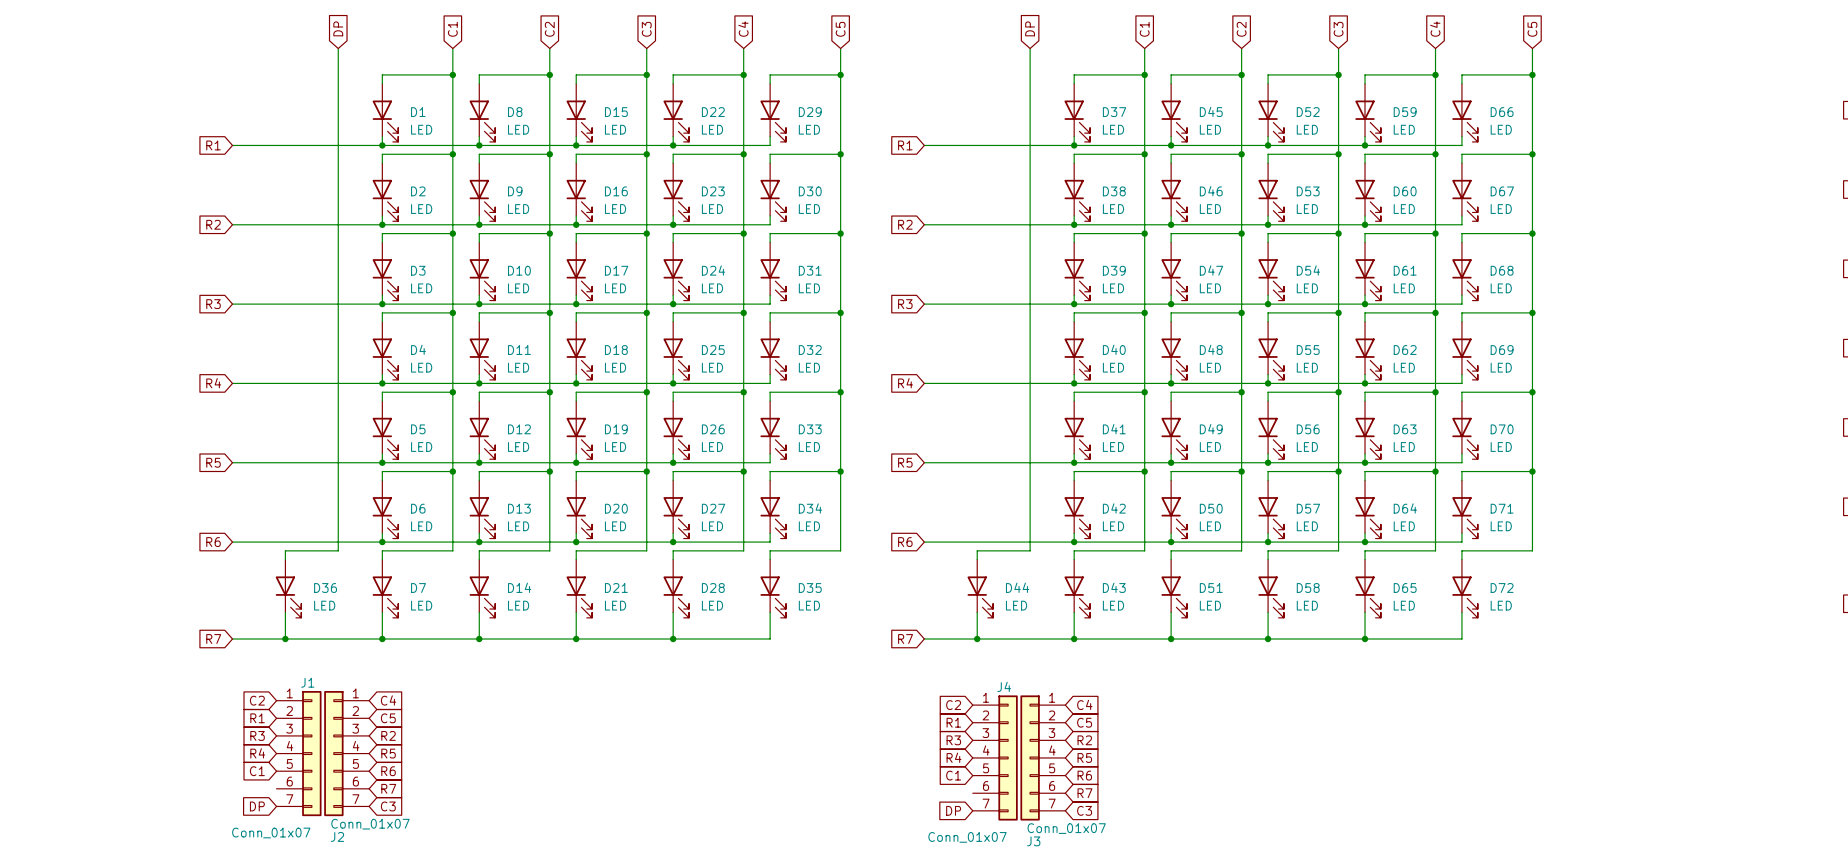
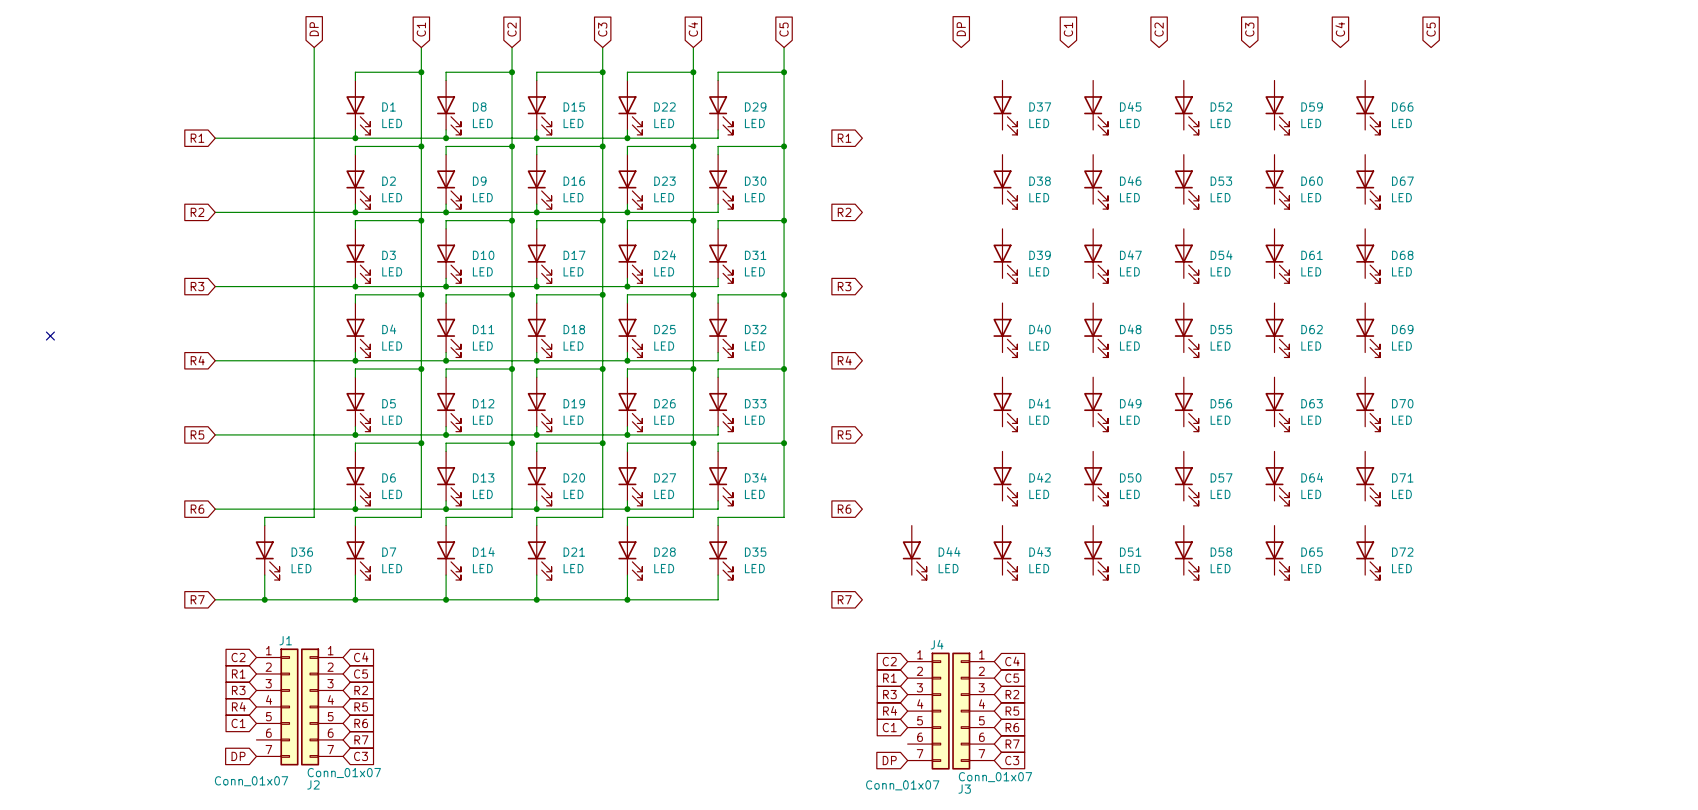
wire: (1030, 48) (1030, 550) (977, 550) (977, 559) -> none
wire: (1144, 48) (1144, 550) (1074, 550) (1074, 559) -> none
wire: (1241, 48) (1241, 550) (1171, 550) (1171, 559) -> none
wire: (1338, 48) (1338, 550) (1268, 550) (1268, 559) -> none
wire: (1435, 48) (1435, 550) (1365, 550) (1365, 559) -> none
wire: (1532, 48) (1532, 550) (1461, 550) (1461, 559) -> none
wire: (1144, 74) (1074, 74) (1074, 83) -> none
junction: (1144, 74) -> none
wire: (1241, 74) (1171, 74) (1171, 83) -> none
junction: (1241, 74) -> none
wire: (1338, 74) (1268, 74) (1268, 83) -> none
junction: (1338, 74) -> none
wire: (1435, 74) (1365, 74) (1365, 83) -> none
junction: (1435, 74) -> none
wire: (1532, 74) (1461, 74) (1461, 83) -> none
junction: (1532, 74) -> none
wire: (1074, 136) (1074, 145) -> none
wire: (1171, 136) (1171, 145) -> none
wire: (1268, 136) (1268, 145) -> none
wire: (1365, 136) (1365, 145) -> none
wire: (1461, 136) (1461, 145) (924, 145) -> none
junction: (1074, 145) -> none
junction: (1171, 145) -> none
junction: (1268, 145) -> none
junction: (1365, 145) -> none
wire: (1144, 154) (1074, 154) (1074, 163) -> none
junction: (1144, 154) -> none
wire: (1241, 154) (1171, 154) (1171, 163) -> none
junction: (1241, 154) -> none
wire: (1338, 154) (1268, 154) (1268, 163) -> none
junction: (1338, 154) -> none
wire: (1435, 154) (1365, 154) (1365, 163) -> none
junction: (1435, 154) -> none
wire: (1532, 154) (1461, 154) (1461, 163) -> none
junction: (1532, 154) -> none
wire: (1074, 215) (1074, 224) -> none
wire: (1171, 215) (1171, 224) -> none
wire: (1268, 215) (1268, 224) -> none
wire: (1365, 215) (1365, 224) -> none
wire: (1461, 215) (1461, 224) (924, 224) -> none
junction: (1074, 224) -> none
junction: (1171, 224) -> none
junction: (1268, 224) -> none
junction: (1365, 224) -> none
wire: (1144, 233) (1074, 233) (1074, 242) -> none
junction: (1144, 233) -> none
wire: (1241, 233) (1171, 233) (1171, 242) -> none
junction: (1241, 233) -> none
wire: (1338, 233) (1268, 233) (1268, 242) -> none
junction: (1338, 233) -> none
wire: (1435, 233) (1365, 233) (1365, 242) -> none
junction: (1435, 233) -> none
wire: (1532, 233) (1461, 233) (1461, 242) -> none
junction: (1532, 233) -> none
wire: (1074, 295) (1074, 304) -> none
wire: (1171, 295) (1171, 304) -> none
wire: (1268, 295) (1268, 304) -> none
wire: (1365, 295) (1365, 304) -> none
wire: (1461, 295) (1461, 304) (924, 304) -> none
junction: (1074, 304) -> none
junction: (1171, 304) -> none
junction: (1268, 304) -> none
junction: (1365, 304) -> none
wire: (1144, 312) (1074, 312) (1074, 321) -> none
junction: (1144, 312) -> none
wire: (1241, 312) (1171, 312) (1171, 321) -> none
junction: (1241, 312) -> none
wire: (1338, 312) (1268, 312) (1268, 321) -> none
junction: (1338, 312) -> none
wire: (1435, 312) (1365, 312) (1365, 321) -> none
junction: (1435, 312) -> none
wire: (1532, 312) (1461, 312) (1461, 321) -> none
junction: (1532, 312) -> none
no-connect mark: none -> (50, 336)
wire: (1074, 374) (1074, 383) -> none
wire: (1171, 374) (1171, 383) -> none
wire: (1268, 374) (1268, 383) -> none
wire: (1365, 374) (1365, 383) -> none
wire: (1461, 374) (1461, 383) (924, 383) -> none
junction: (1074, 383) -> none
junction: (1171, 383) -> none
junction: (1268, 383) -> none
junction: (1365, 383) -> none
wire: (1144, 392) (1074, 392) (1074, 401) -> none
junction: (1144, 392) -> none
wire: (1241, 392) (1171, 392) (1171, 401) -> none
junction: (1241, 392) -> none
wire: (1338, 392) (1268, 392) (1268, 401) -> none
junction: (1338, 392) -> none
wire: (1435, 392) (1365, 392) (1365, 401) -> none
junction: (1435, 392) -> none
wire: (1532, 392) (1461, 392) (1461, 401) -> none
junction: (1532, 392) -> none
wire: (1074, 453) (1074, 462) -> none
wire: (1171, 453) (1171, 462) -> none
wire: (1268, 453) (1268, 462) -> none
wire: (1365, 453) (1365, 462) -> none
wire: (1461, 453) (1461, 462) (924, 462) -> none
junction: (1074, 462) -> none
junction: (1171, 462) -> none
junction: (1268, 462) -> none
junction: (1365, 462) -> none
wire: (1144, 471) (1074, 471) (1074, 480) -> none
junction: (1144, 471) -> none
wire: (1241, 471) (1171, 471) (1171, 480) -> none
junction: (1241, 471) -> none
wire: (1338, 471) (1268, 471) (1268, 480) -> none
junction: (1338, 471) -> none
wire: (1435, 471) (1365, 471) (1365, 480) -> none
junction: (1435, 471) -> none
wire: (1532, 471) (1461, 471) (1461, 480) -> none
junction: (1532, 471) -> none
wire: (1074, 533) (1074, 542) -> none
wire: (1171, 533) (1171, 542) -> none
wire: (1268, 533) (1268, 542) -> none
wire: (1365, 533) (1365, 542) -> none
wire: (1461, 533) (1461, 542) (924, 542) -> none
junction: (1074, 542) -> none
junction: (1171, 542) -> none
junction: (1268, 542) -> none
junction: (1365, 542) -> none
wire: (977, 612) (977, 639) -> none
wire: (1074, 612) (1074, 639) -> none
wire: (1171, 612) (1171, 639) -> none
wire: (1268, 612) (1268, 639) -> none
wire: (1365, 612) (1365, 639) -> none
wire: (1461, 612) (1461, 639) (924, 639) -> none
junction: (977, 639) -> none
junction: (1074, 639) -> none
junction: (1171, 639) -> none
junction: (1268, 639) -> none
junction: (1365, 639) -> none

